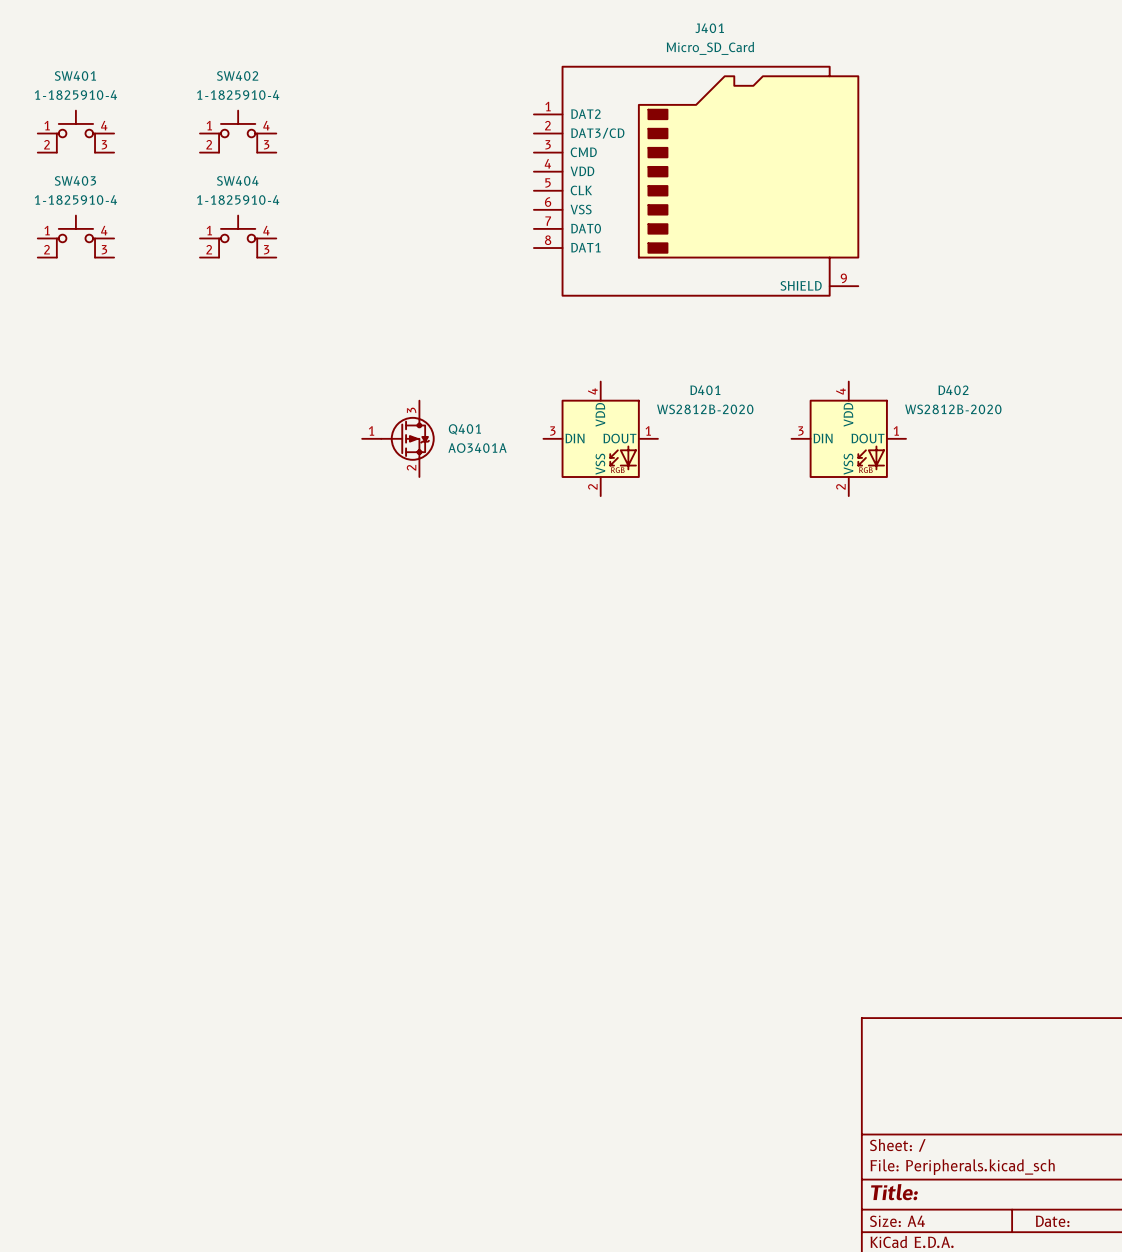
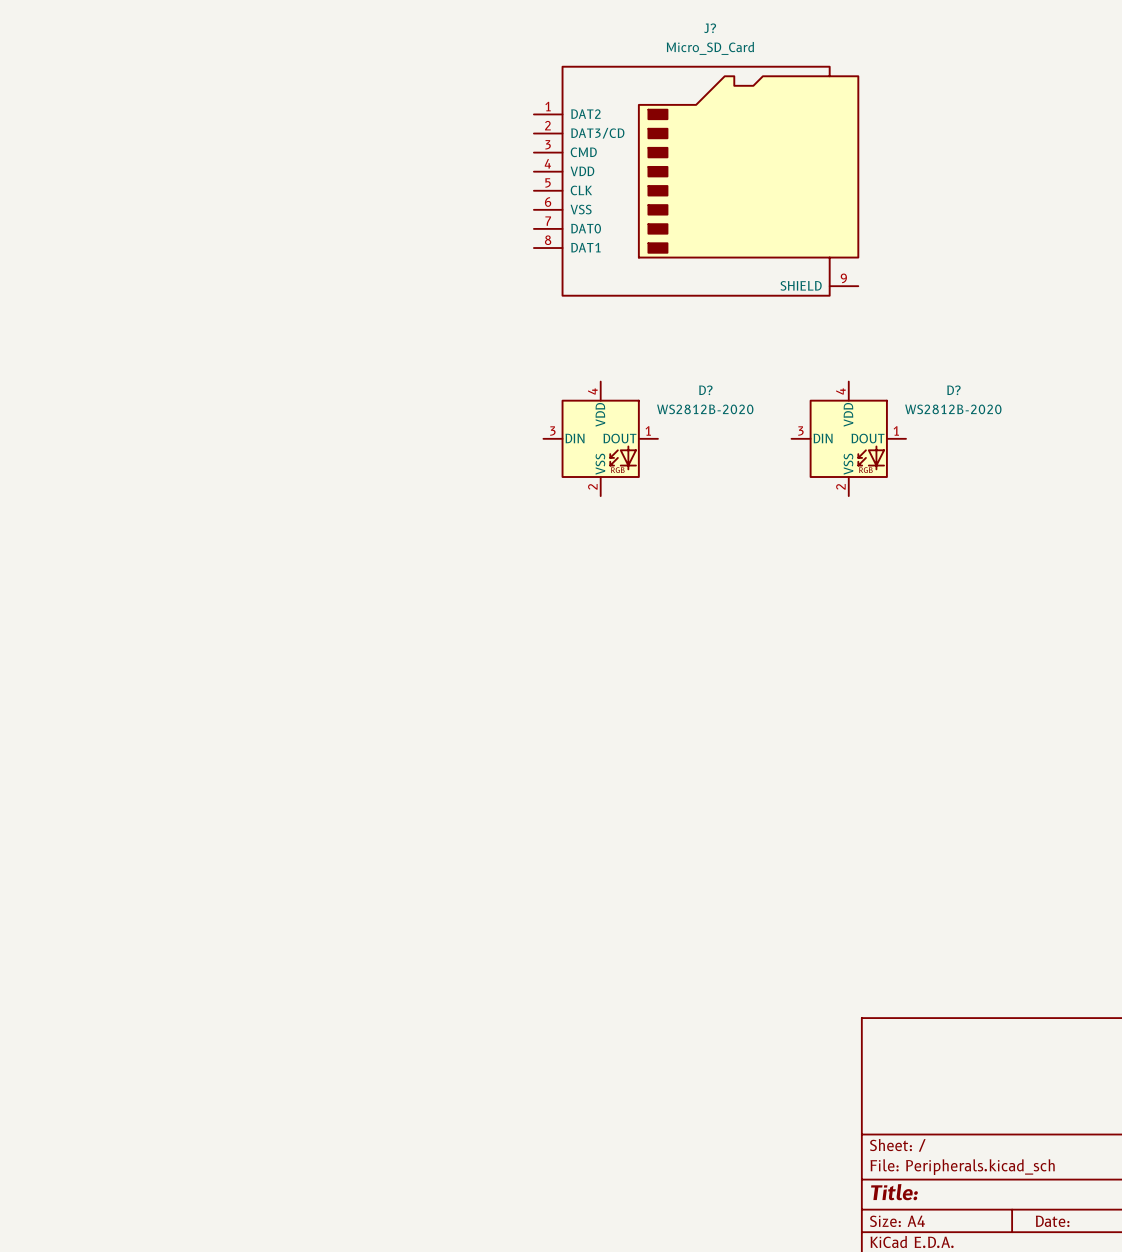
J401 name: J401 (709, 28) -> J? (710, 28)
SW401: 1-1825910-4 (75, 131) -> none
SW402: 1-1825910-4 (238, 131) -> none
SW403: 1-1825910-4 (75, 236) -> none
SW404: 1-1825910-4 (238, 236) -> none
D401 name: D401 (705, 390) -> D? (705, 390)
D402 name: D402 (953, 390) -> D? (953, 390)
Q401: AO3401A (398, 438) -> none

